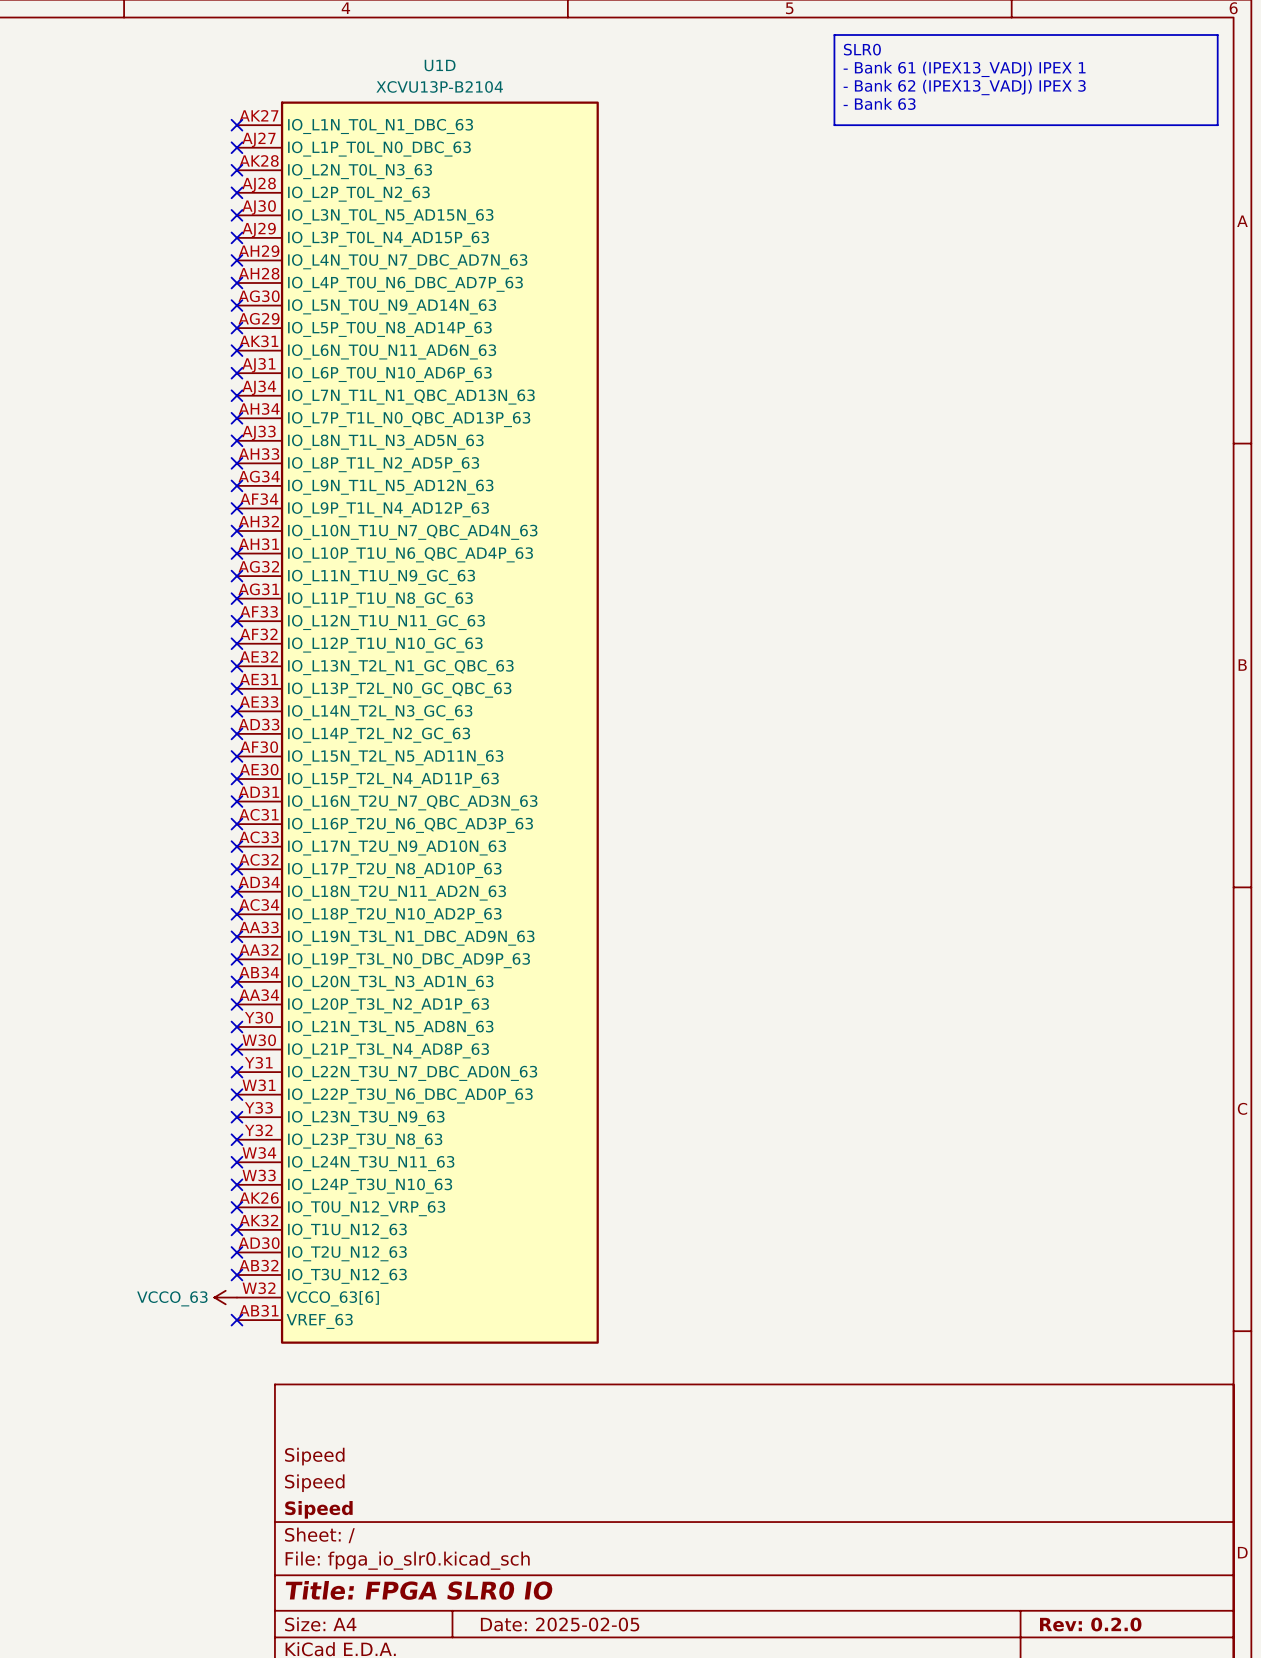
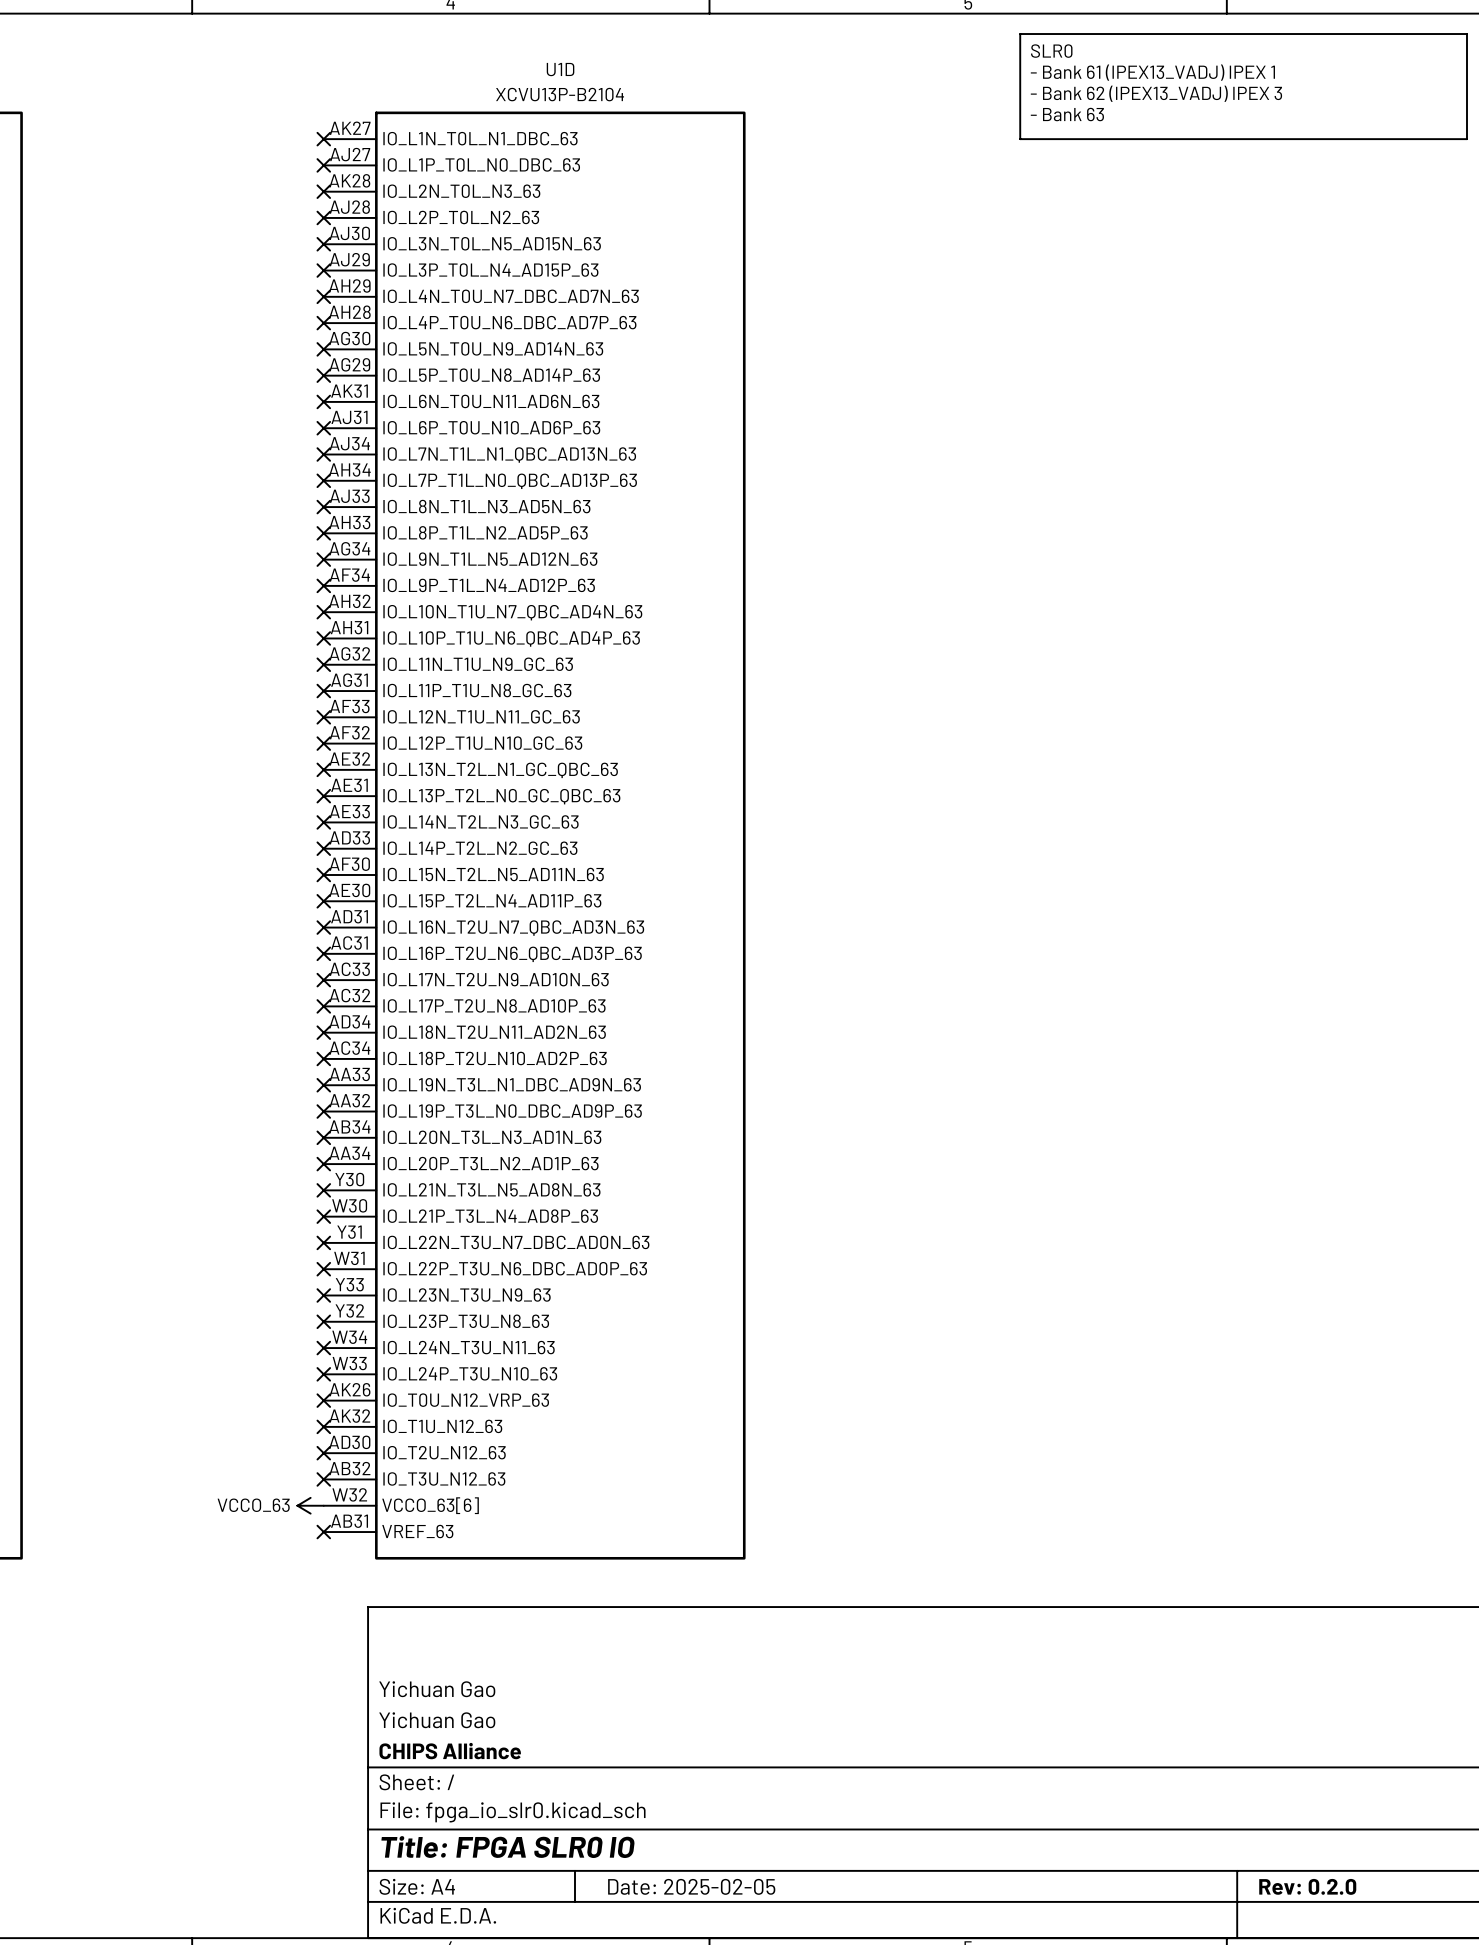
title block: Sipeed (314, 1456) -> Yichuan Gao (437, 1689)
title block: Sipeed (314, 1483) -> Yichuan Gao (437, 1720)
title block: Sipeed (318, 1509) -> CHIPS Alliance (450, 1751)

